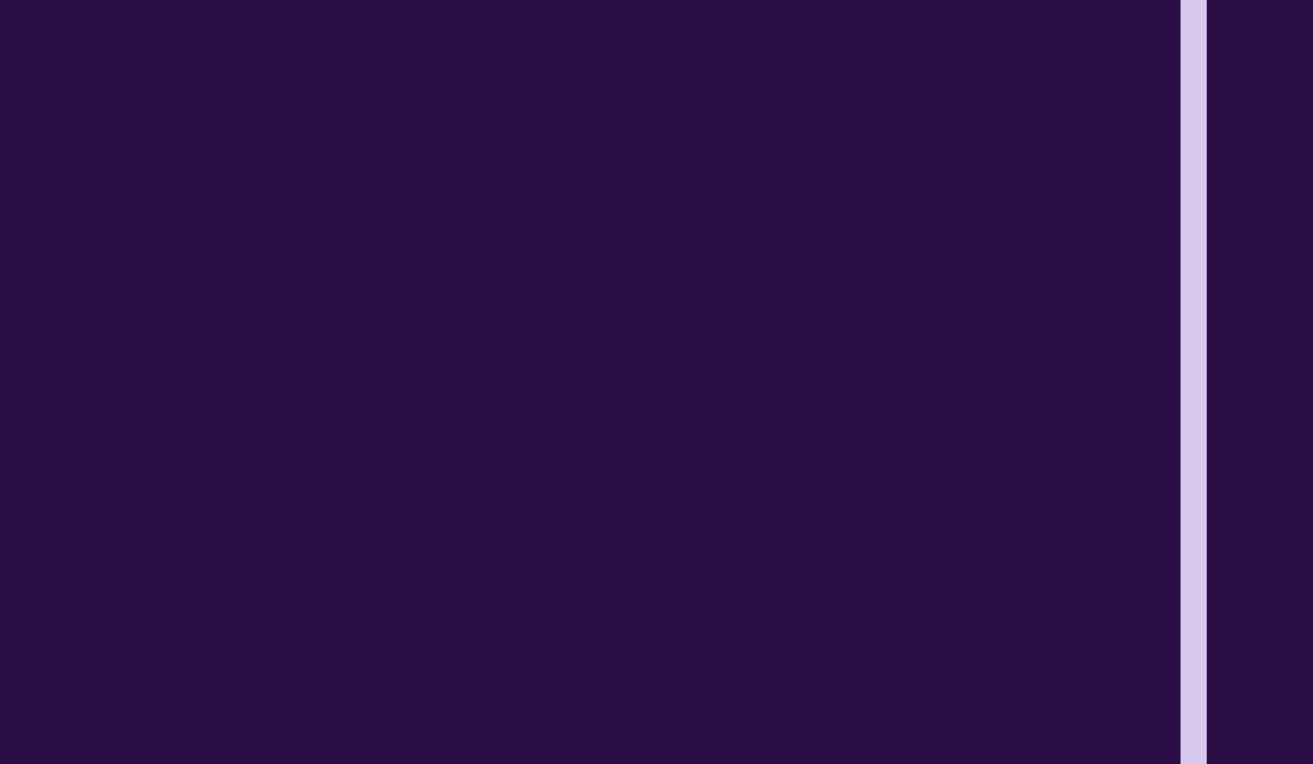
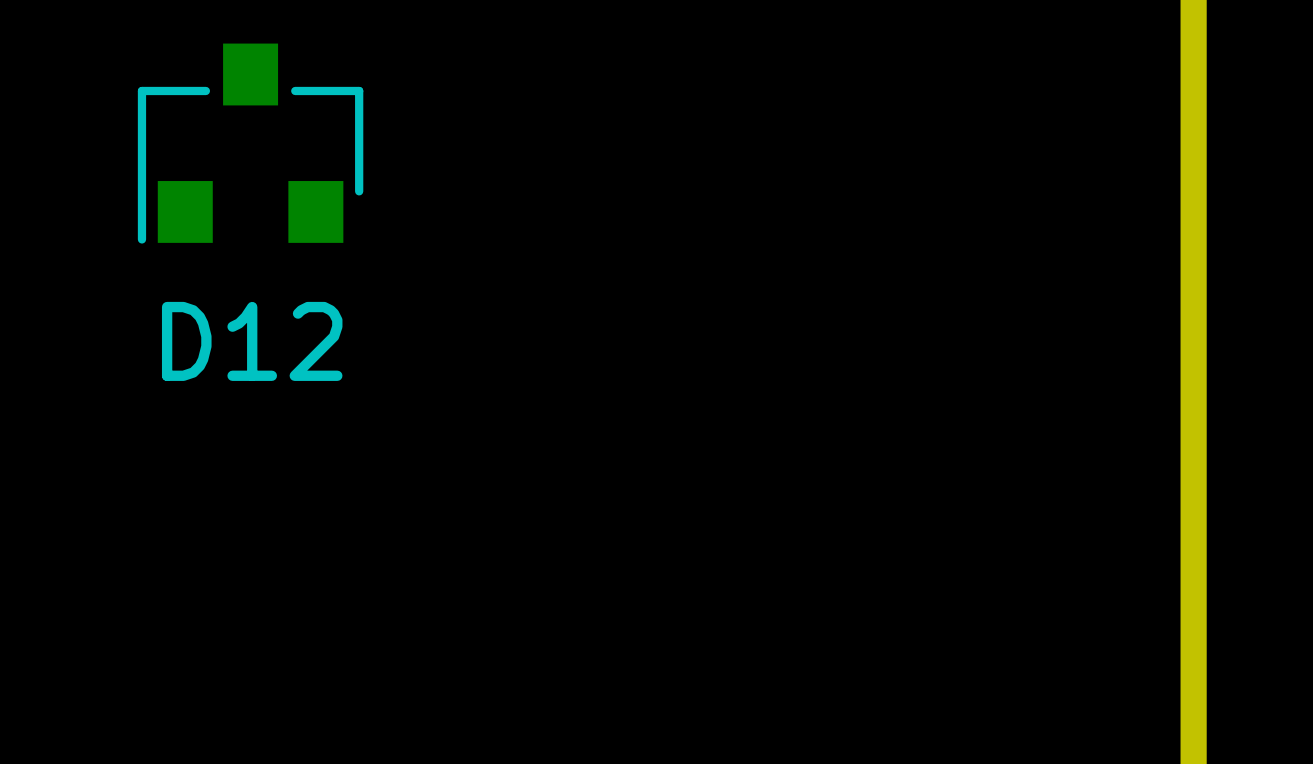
D12: none -> (250, 143)

